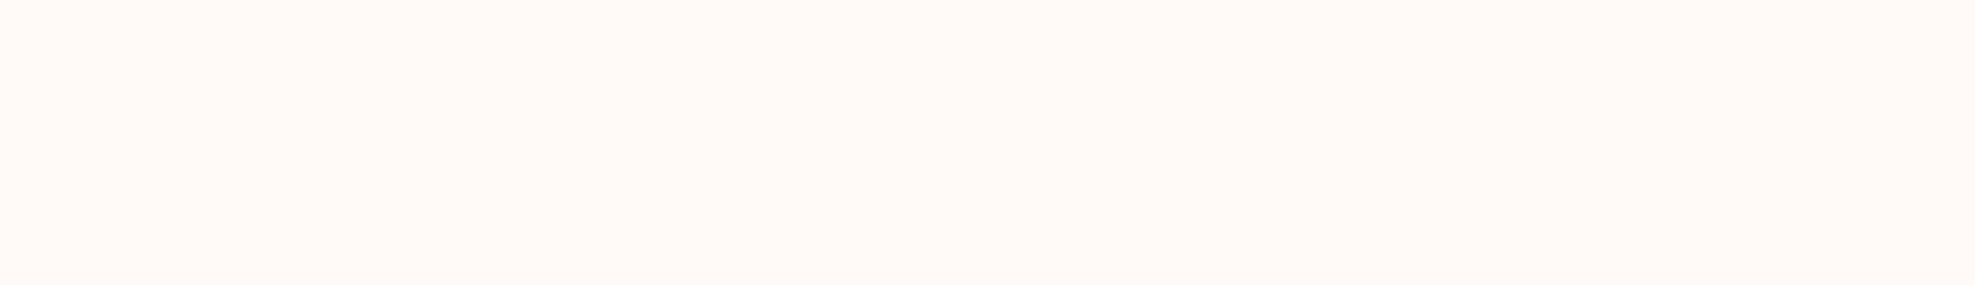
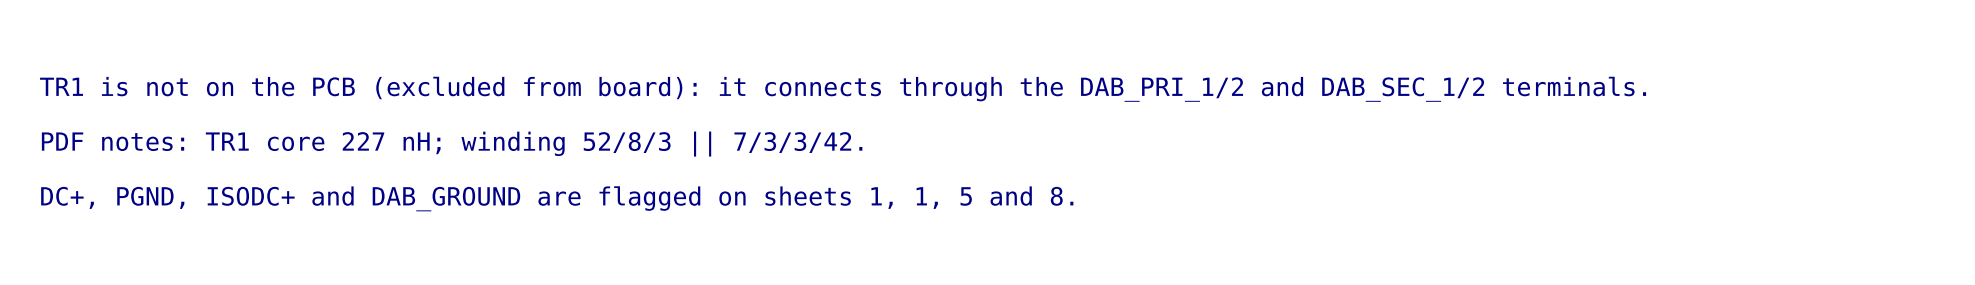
text: none -> TR1 is not on the PCB (excluded from board): it connects through the DAB_PRI_1/2 and DAB_SEC_1/2 terminals. (843, 89)
text: none -> PDF notes: TR1 core 227 nH; winding 52/8/3 || 7/3/3/42. (452, 144)
text: none -> DC+, PGND, ISODC+ and DAB_GROUND are flagged on sheets 1, 1, 5 and 8. (557, 198)

